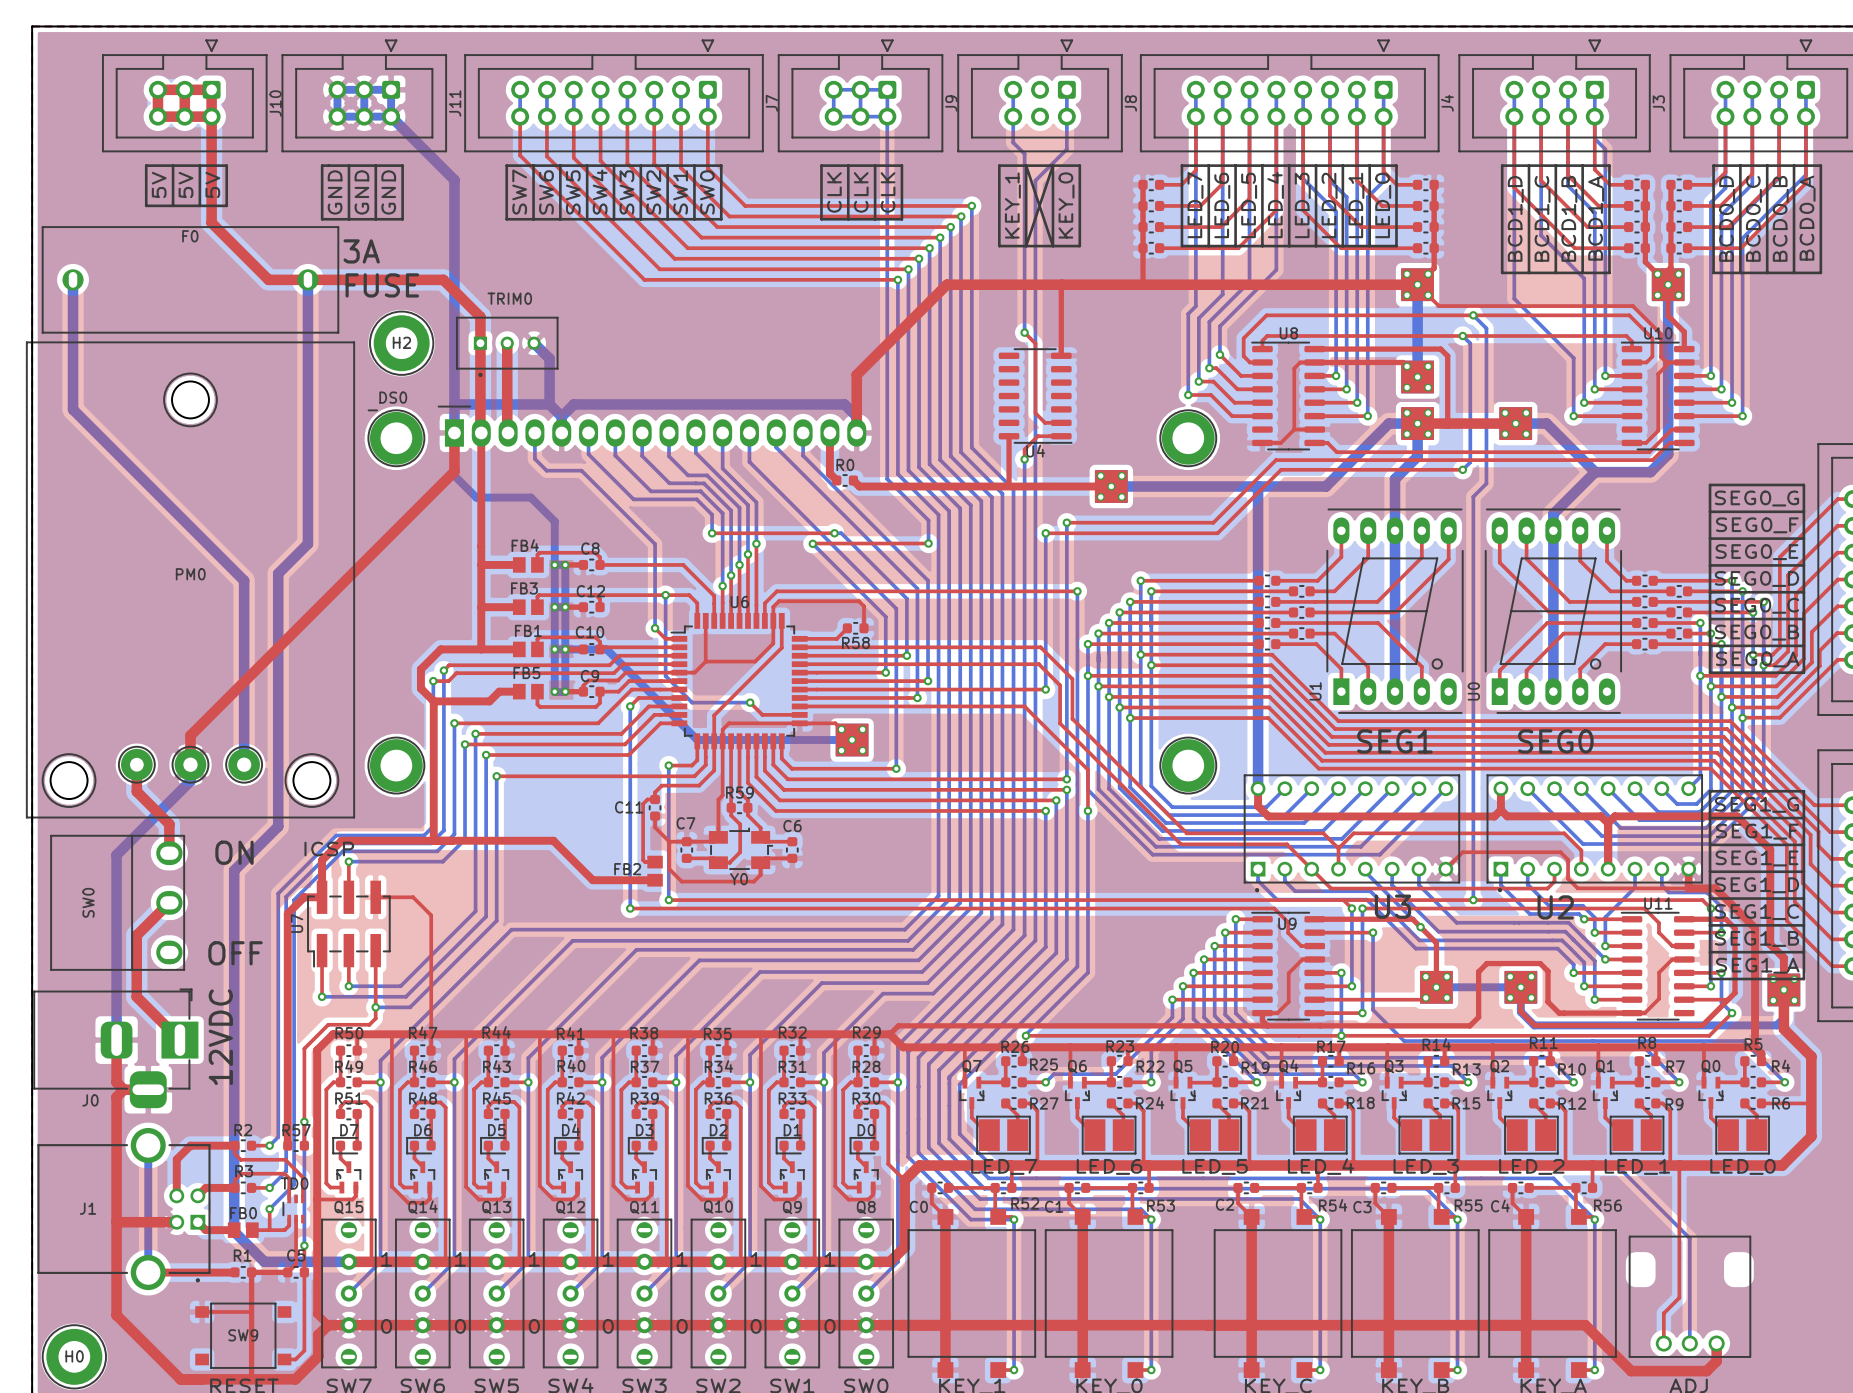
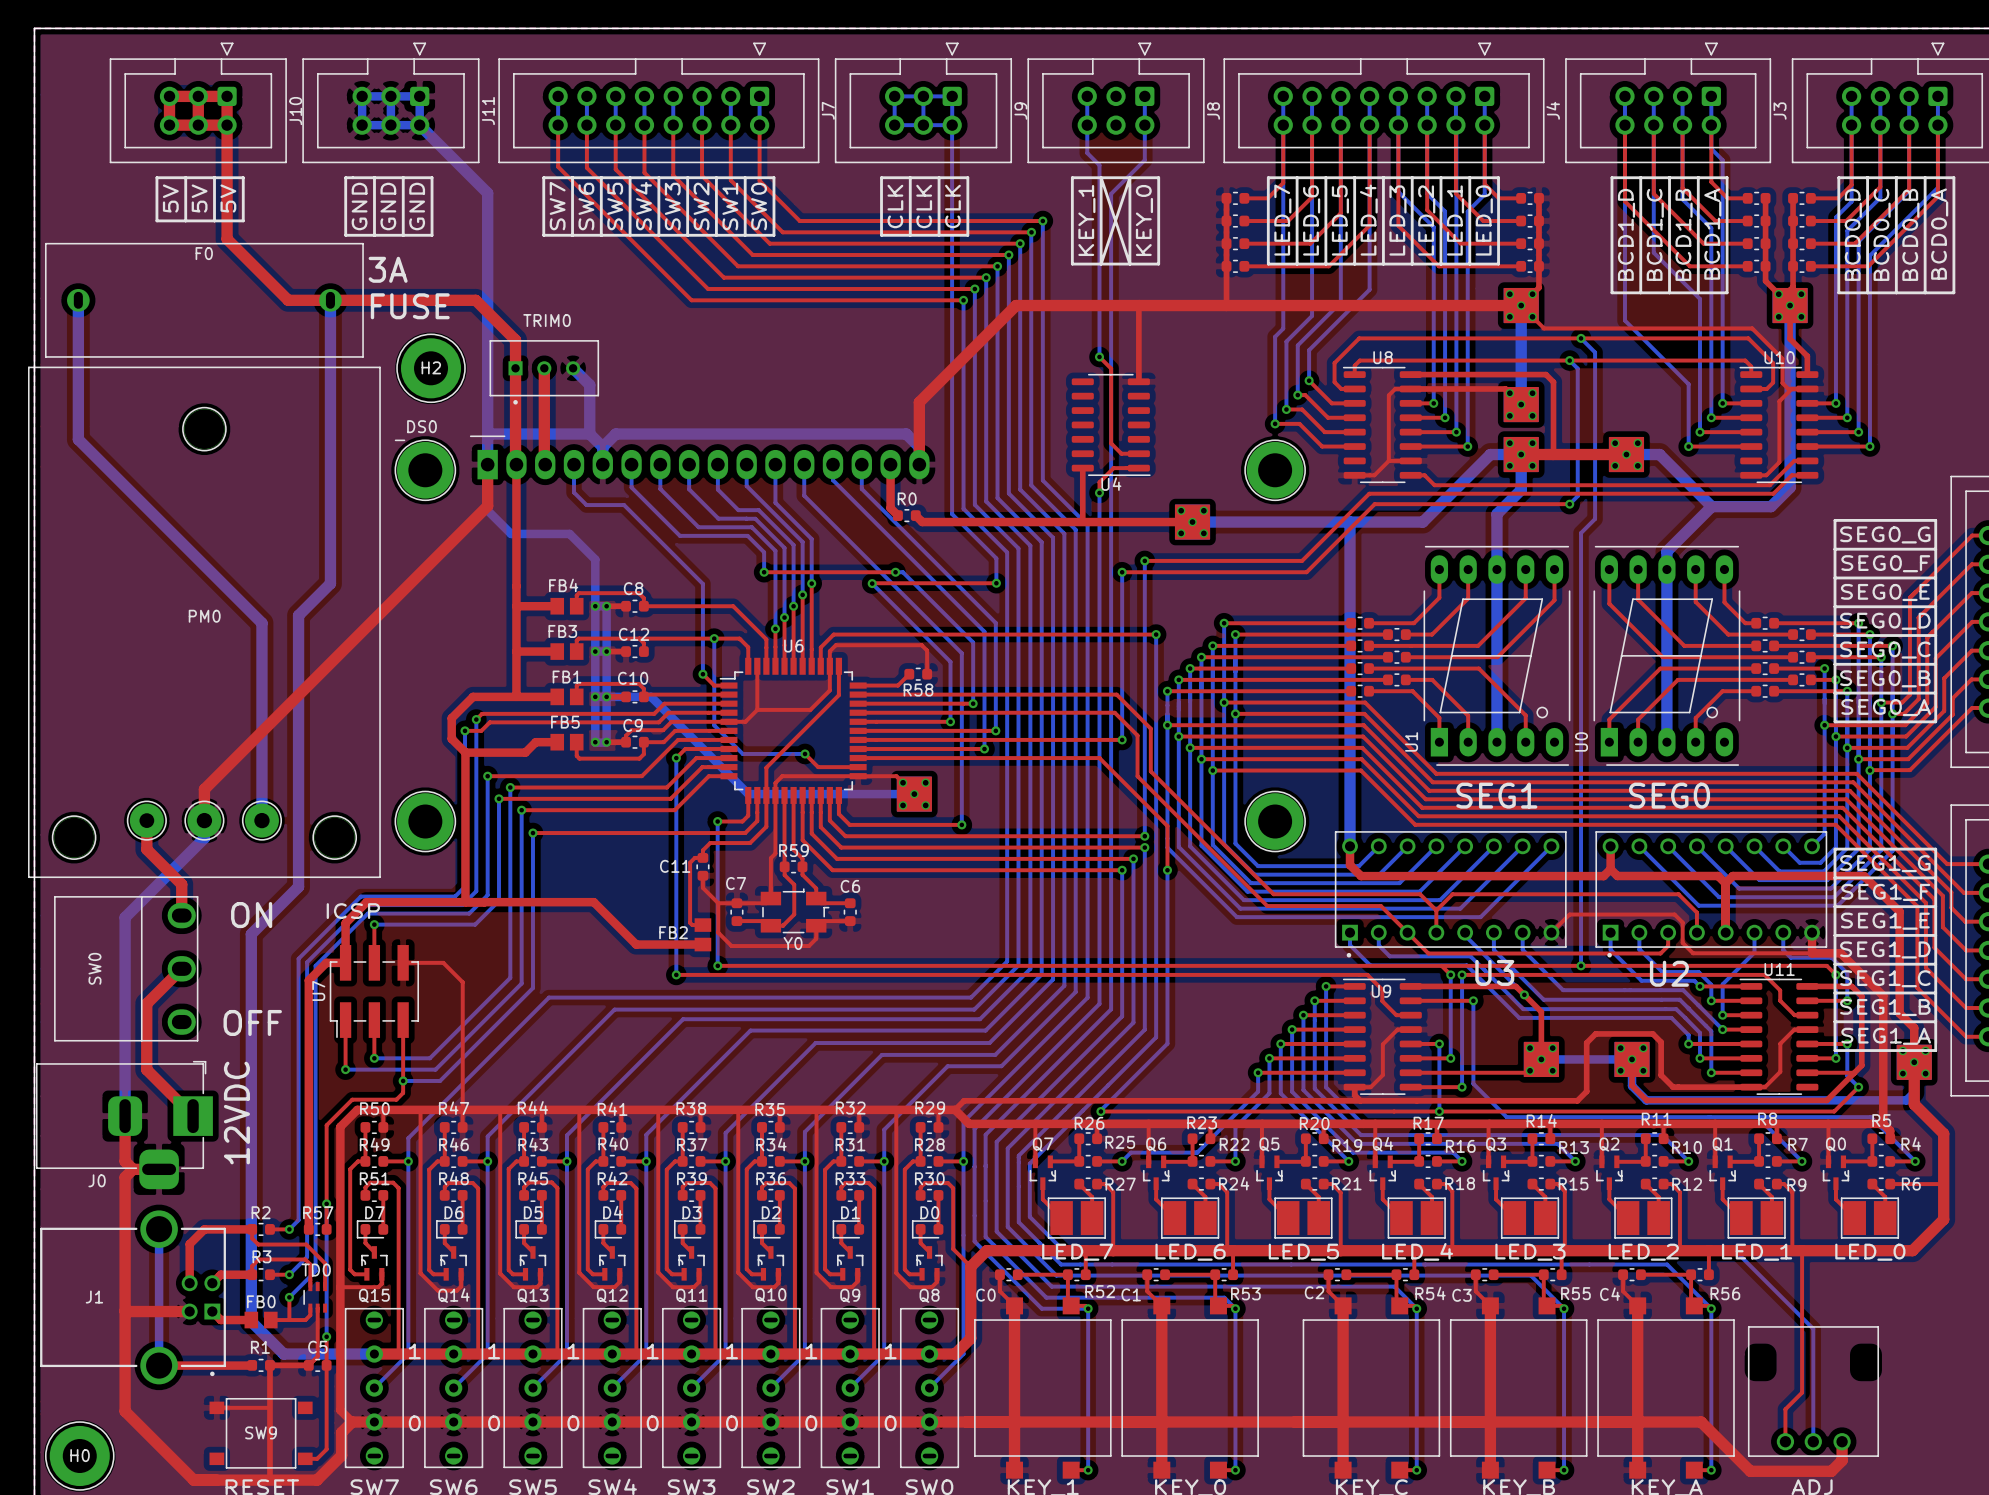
PM0 footprint: [26, 341, 355, 819] -> [28, 366, 381, 878]

